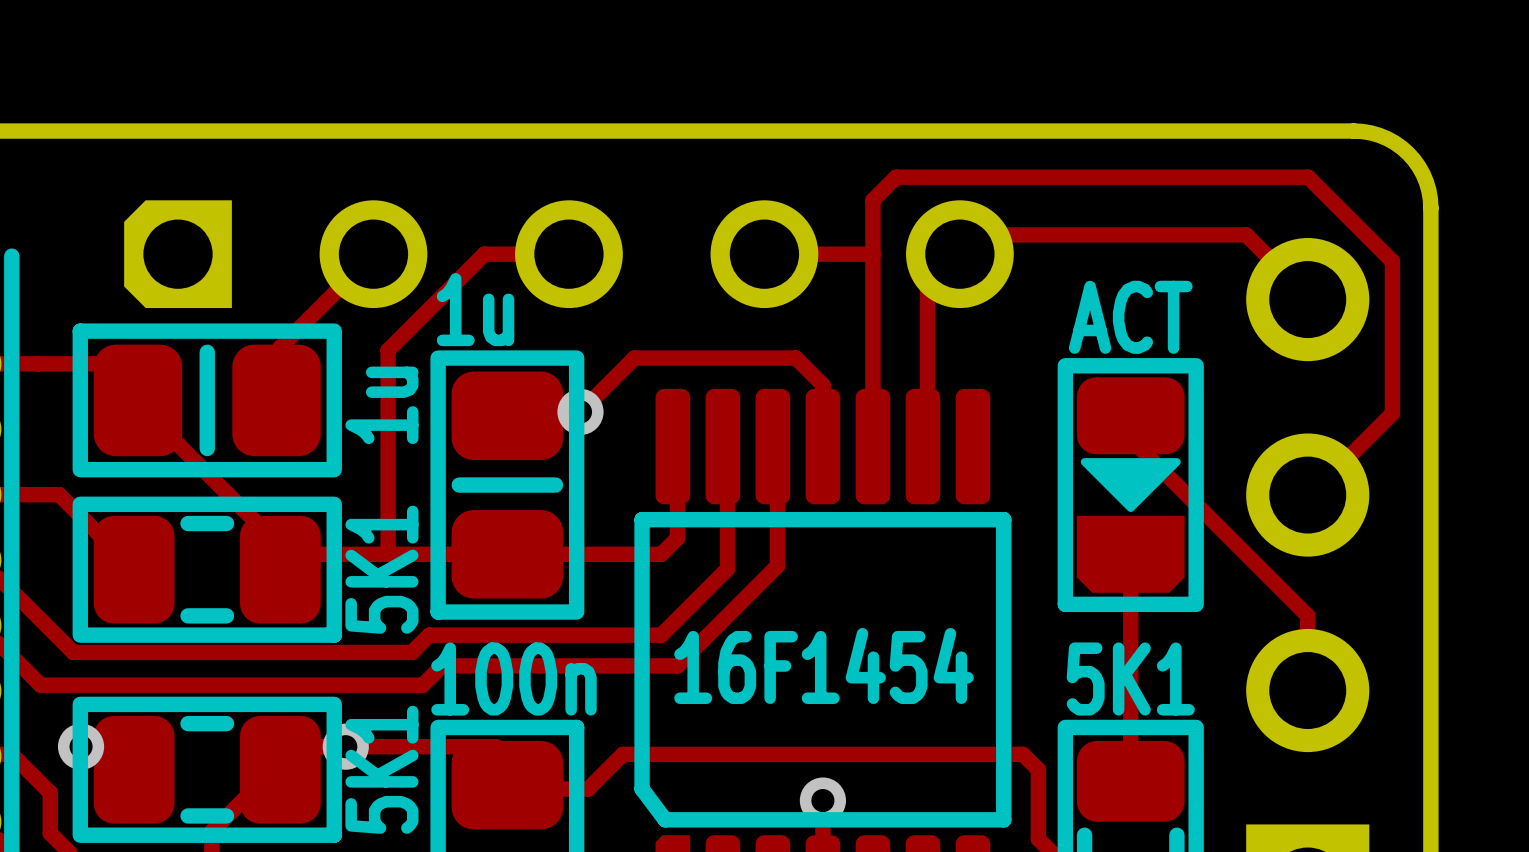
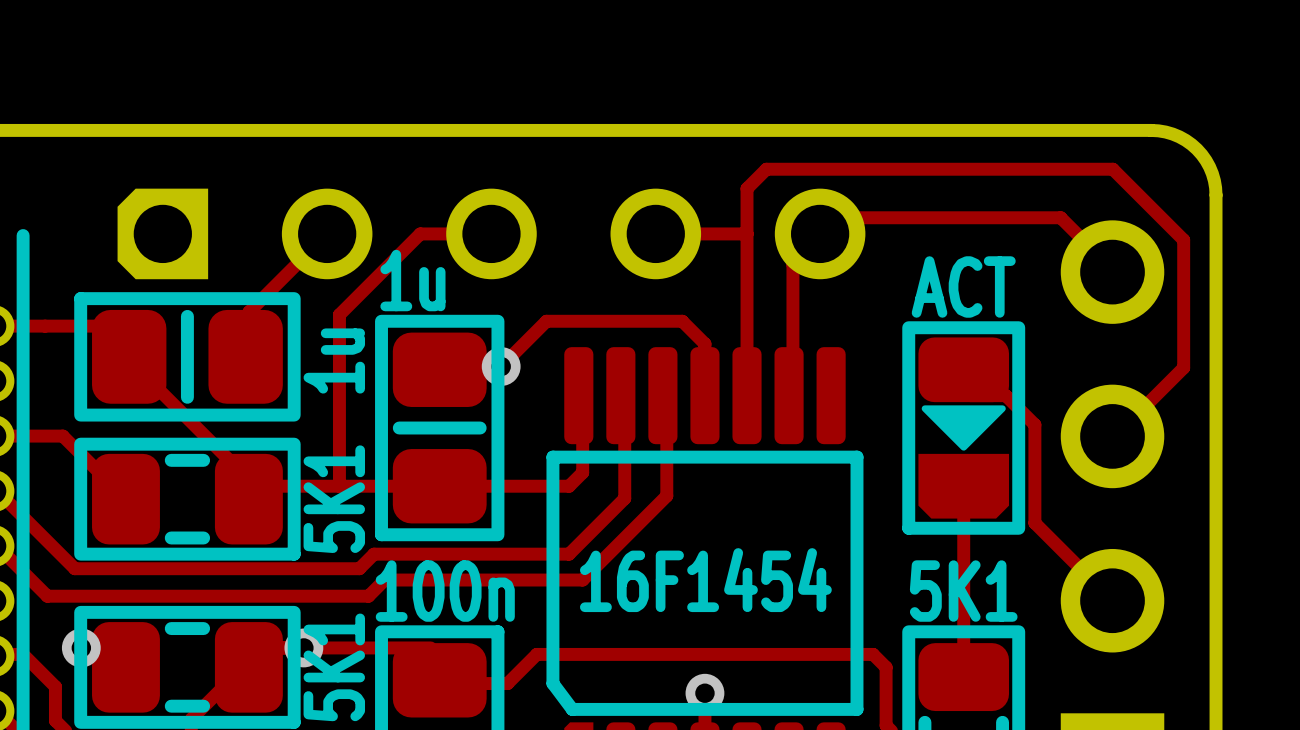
track: (1138, 446) (1307, 615) (1307, 690) -> (970, 395) (1005, 395) (1034, 424) (1034, 523) (1112, 600)

